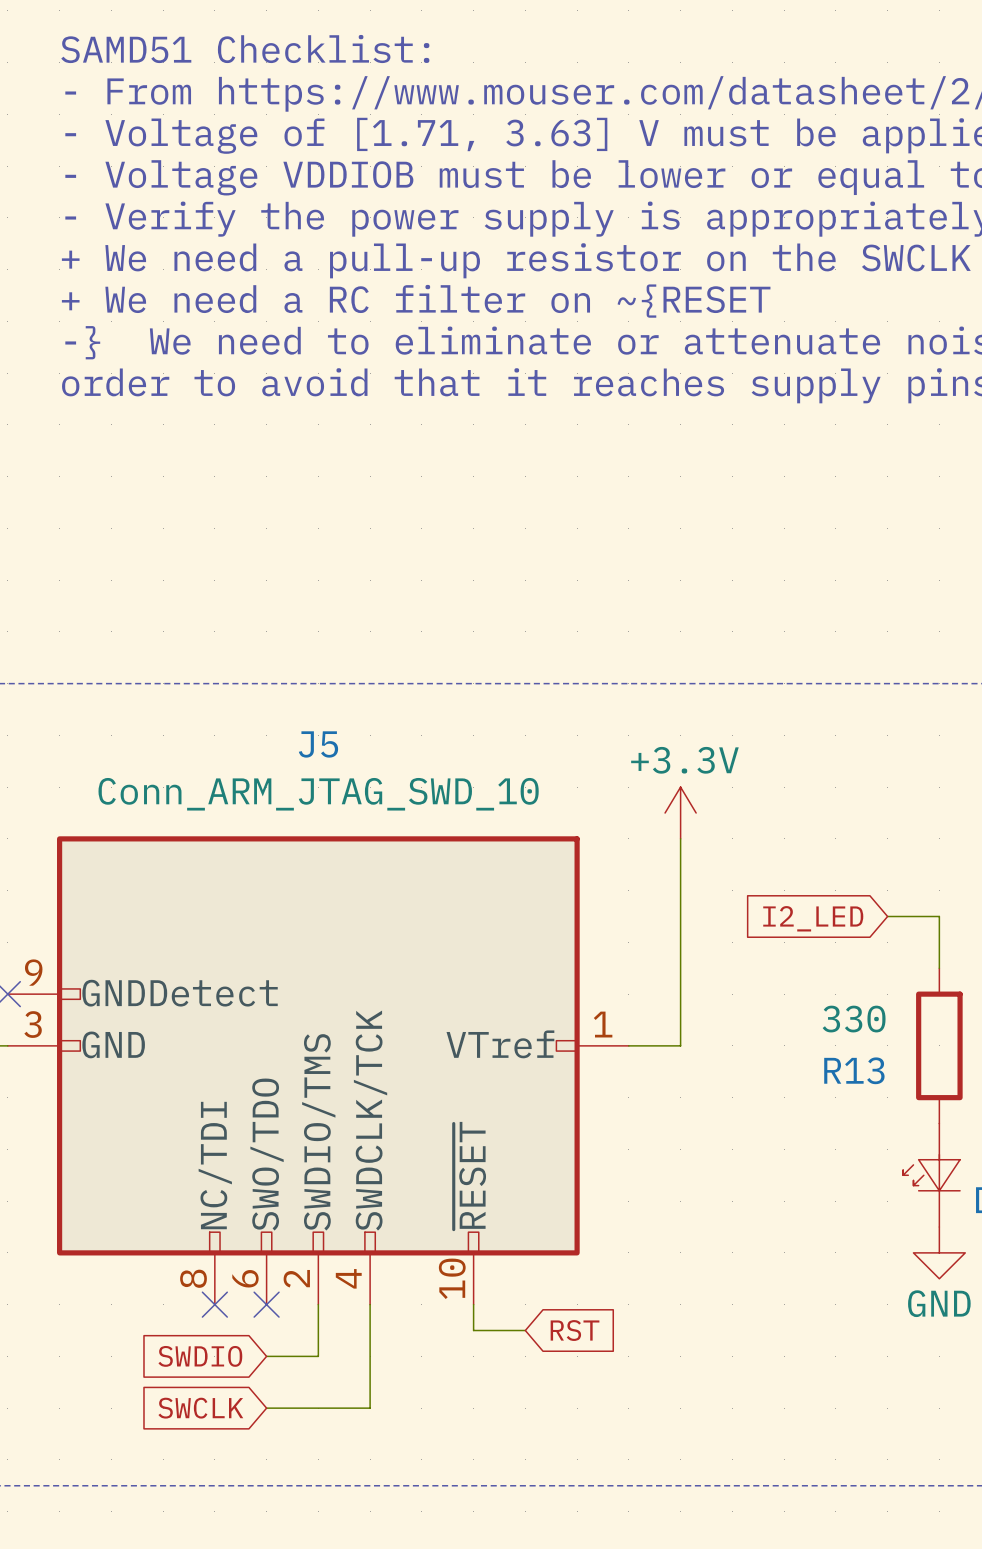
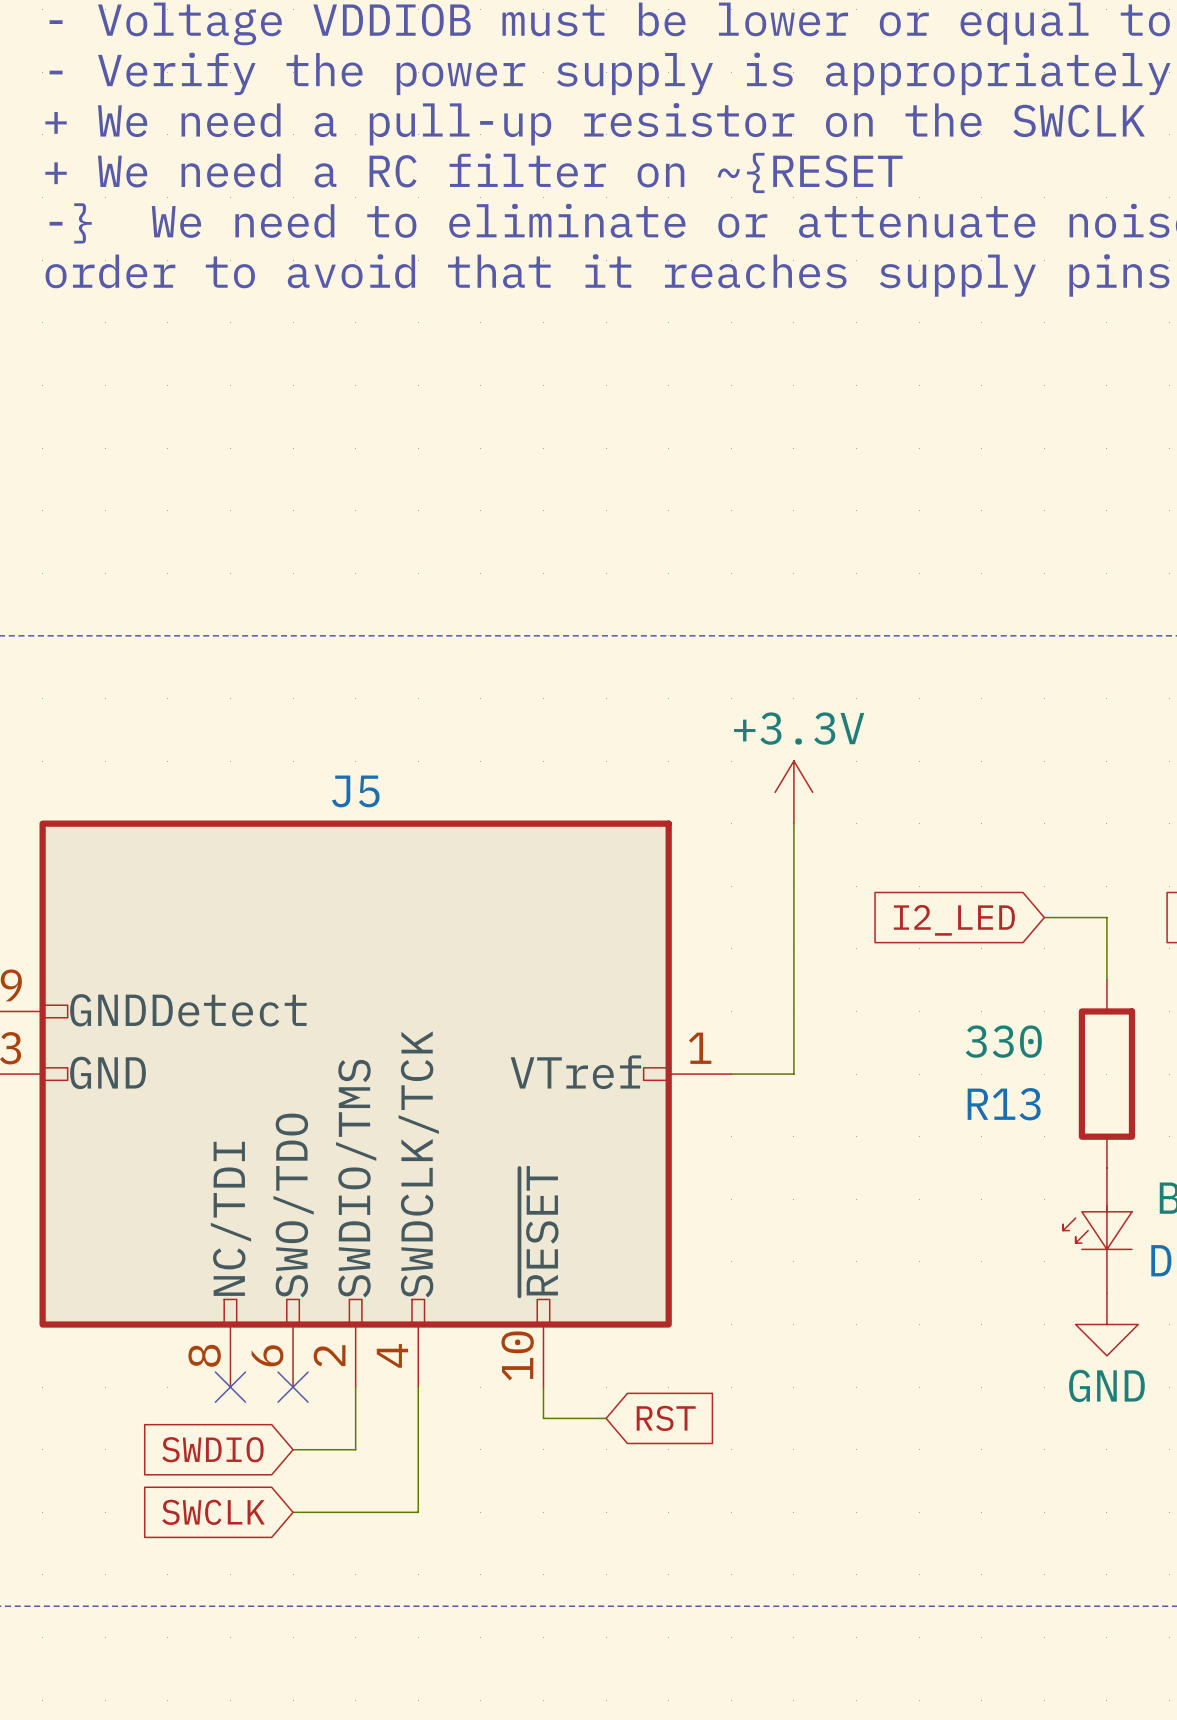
J5 name position: J5 (318, 744) -> J5 (355, 791)
J5 value: Conn_ARM_JTAG_SWD_10 (318, 794) -> none

